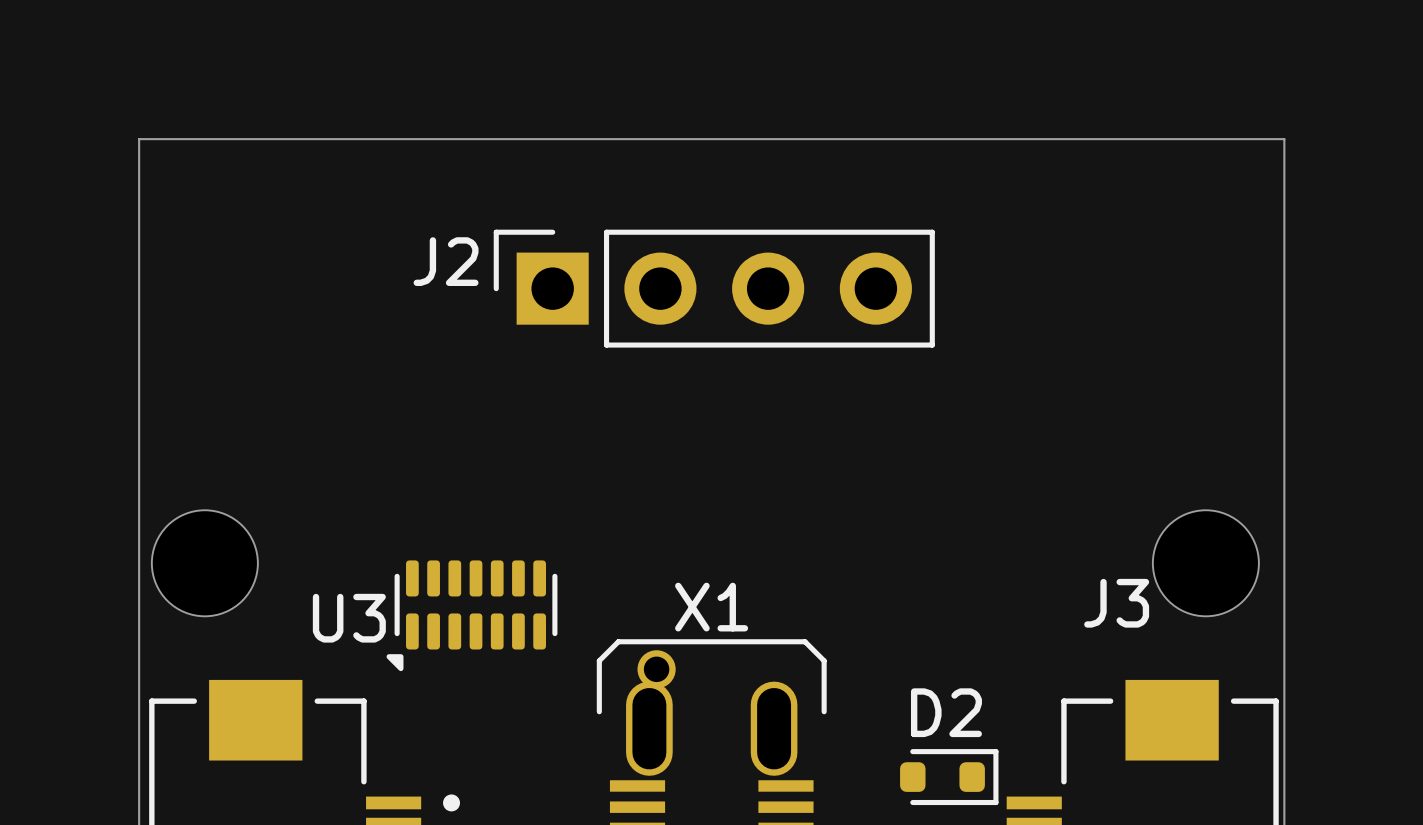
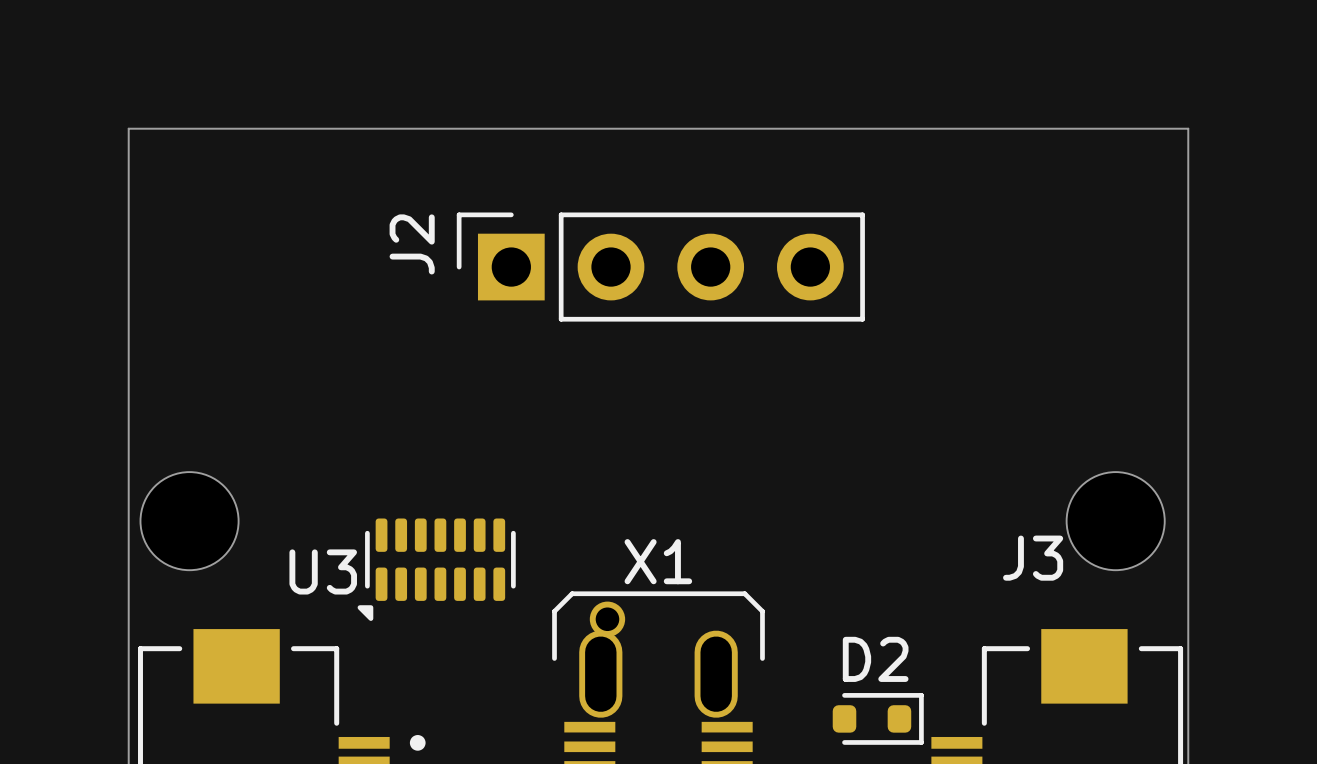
J2 name rotation: 0° (446, 261) -> 90° counterclockwise (412, 244)

